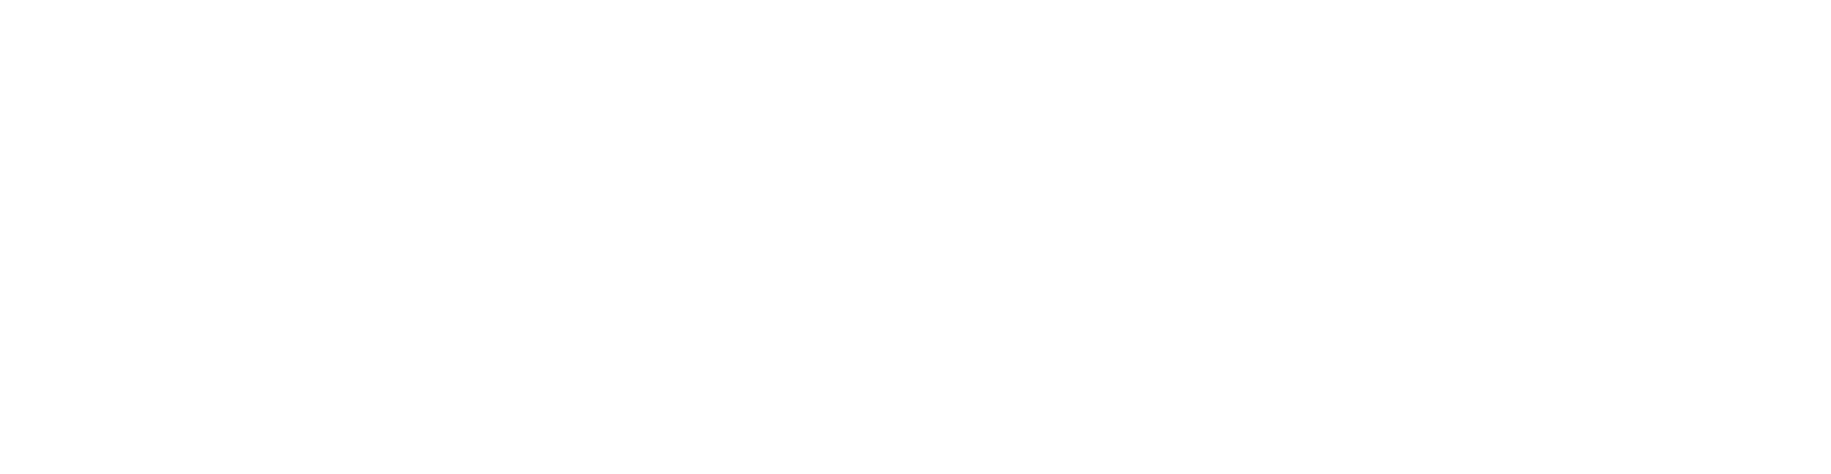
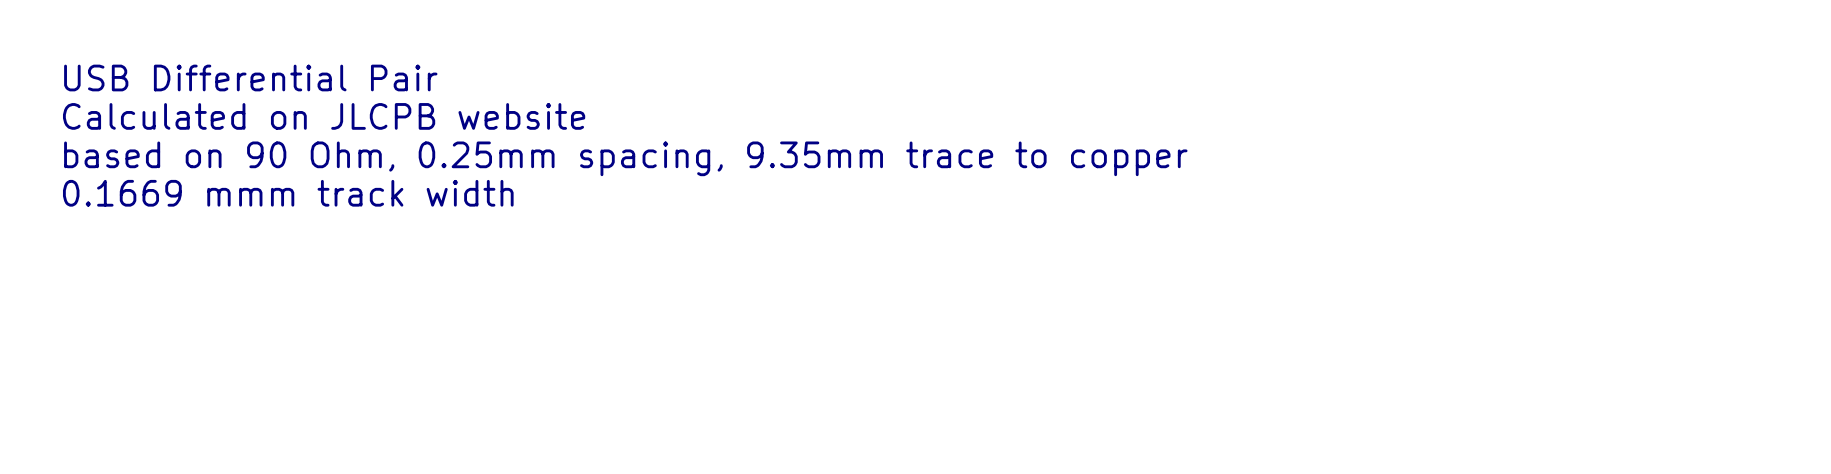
text: none -> USB Differential Pair (250, 78)
text: none -> Calculated on JLCPB website (324, 116)
text: none -> based on 90 Ohm, 0.25mm spacing, 9.35mm trace to copper (625, 158)
text: none -> 0.1669 mmm track width (288, 193)

